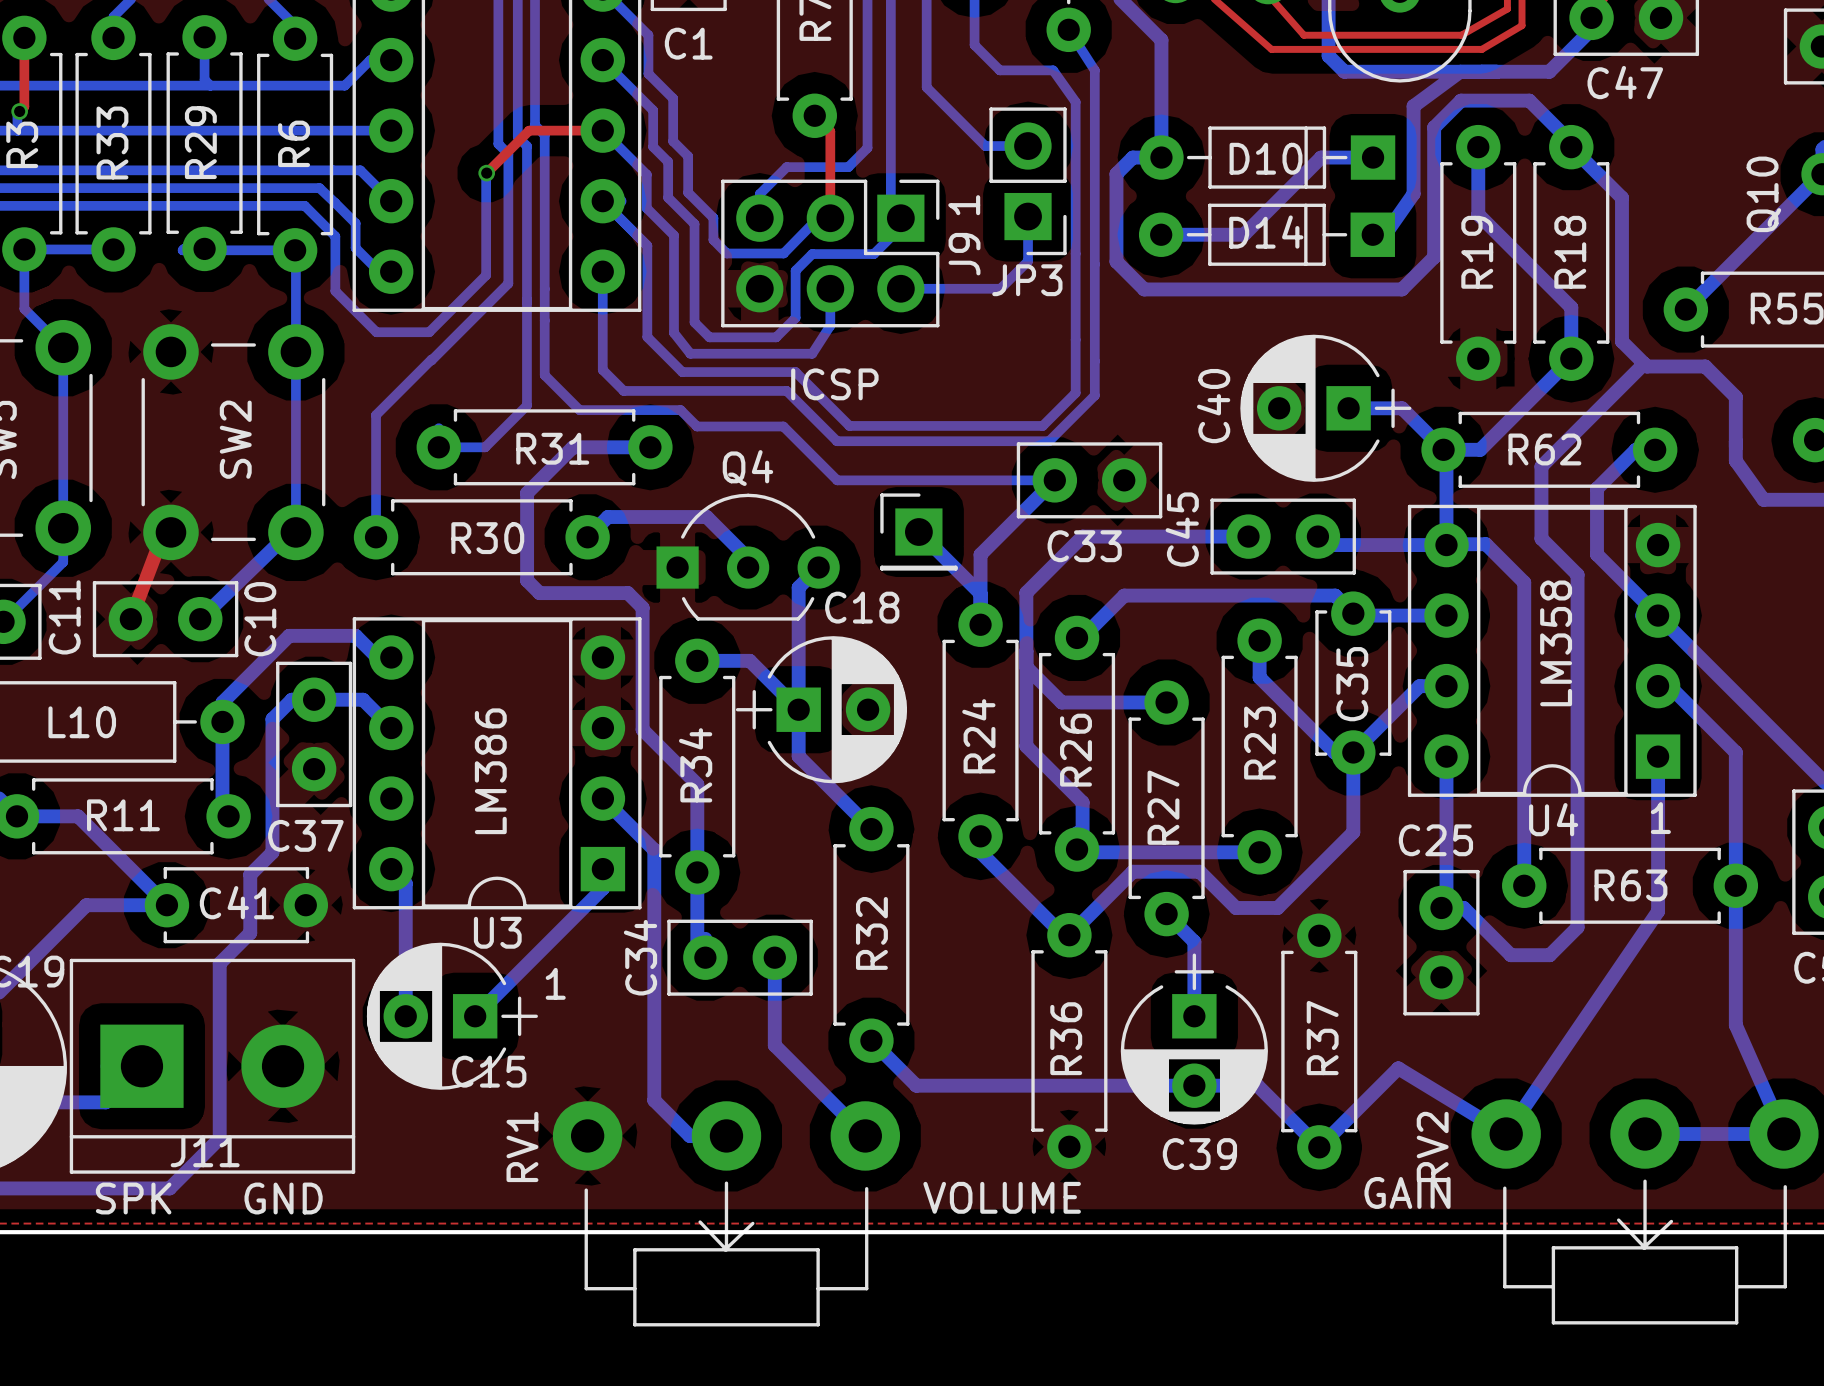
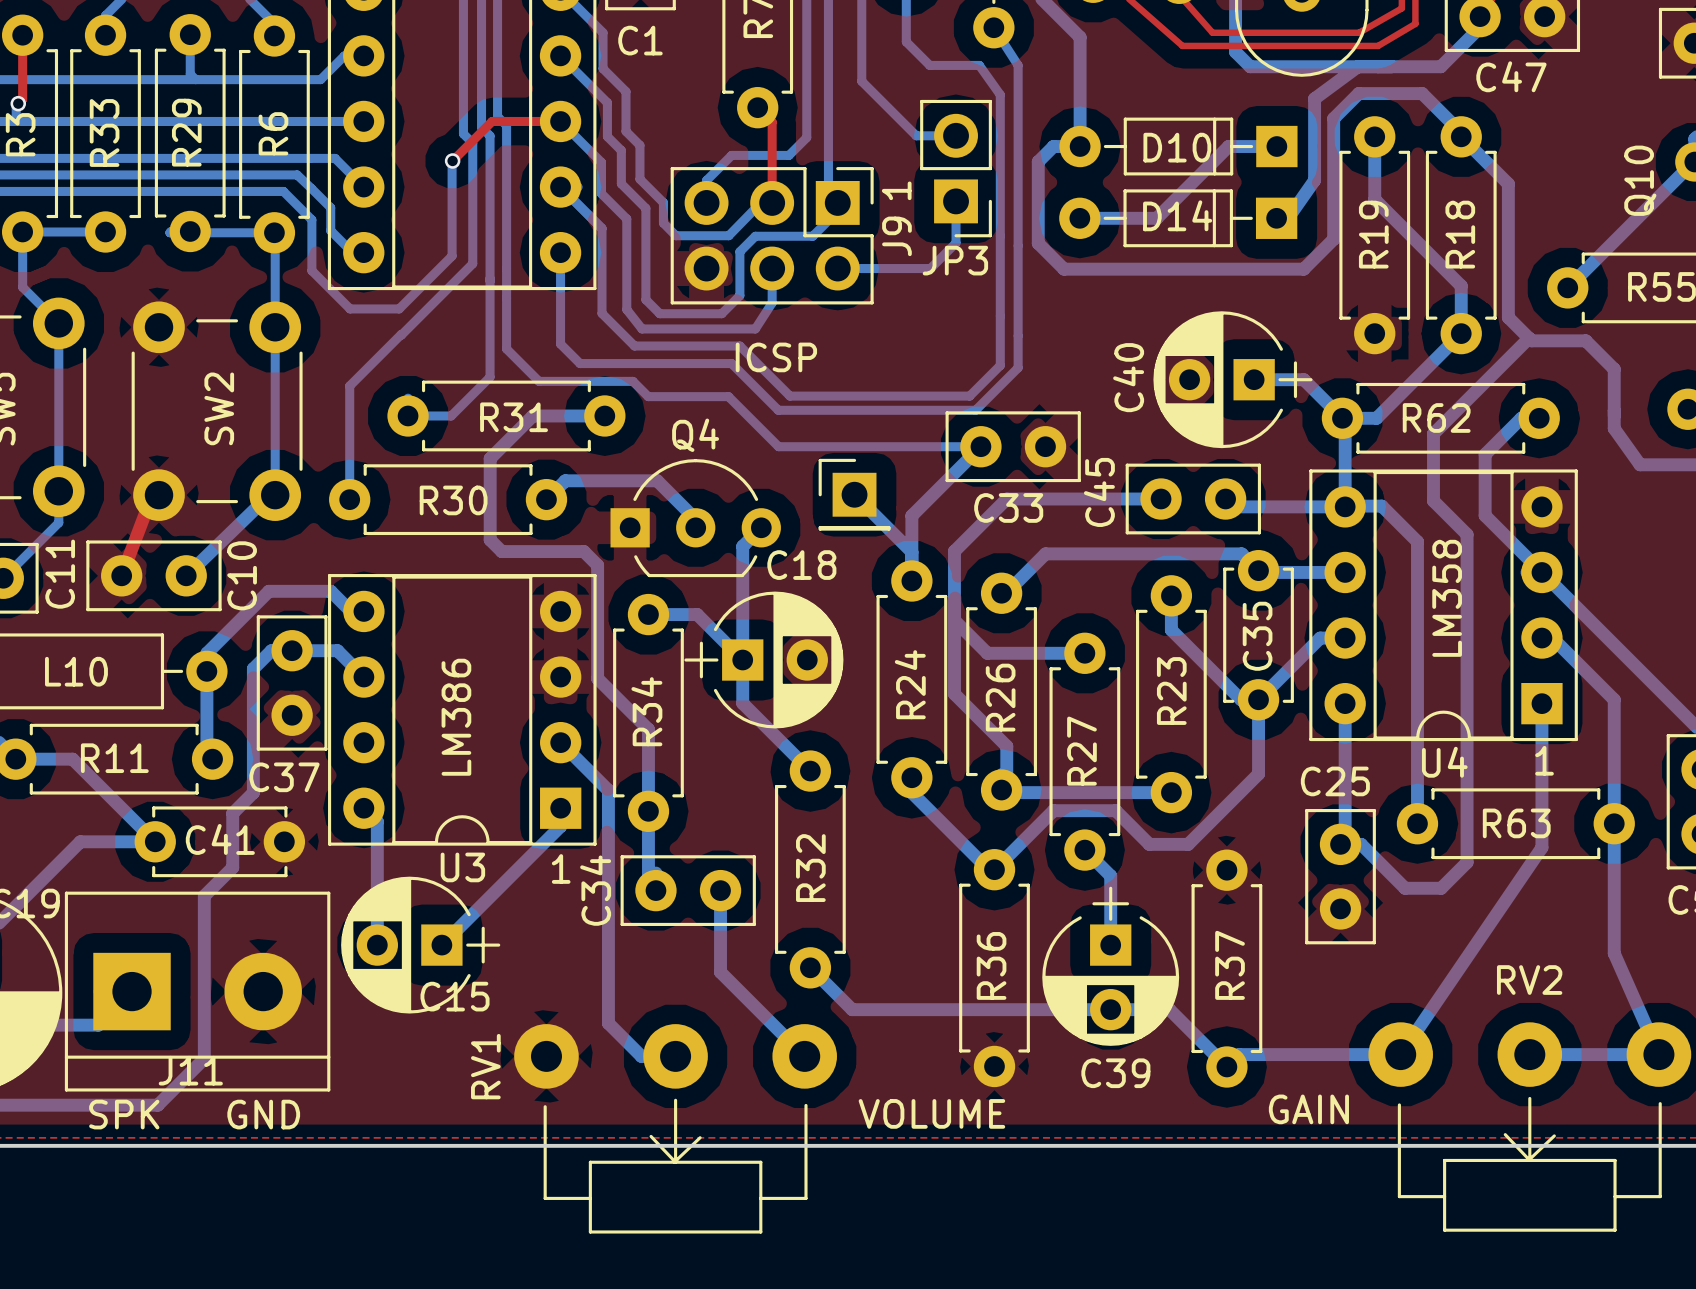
text position: 1 (555, 983) -> 1 (561, 868)
bottom track: (1332, 1134) (1398, 1068) (1506, 1134) -> (1239, 1054) (1400, 1054)
RV2 name rotation: 0° (1432, 1146) -> 90° clockwise (1529, 980)
RV2 name position: RV2 (1432, 1146) -> RV2 (1529, 980)

